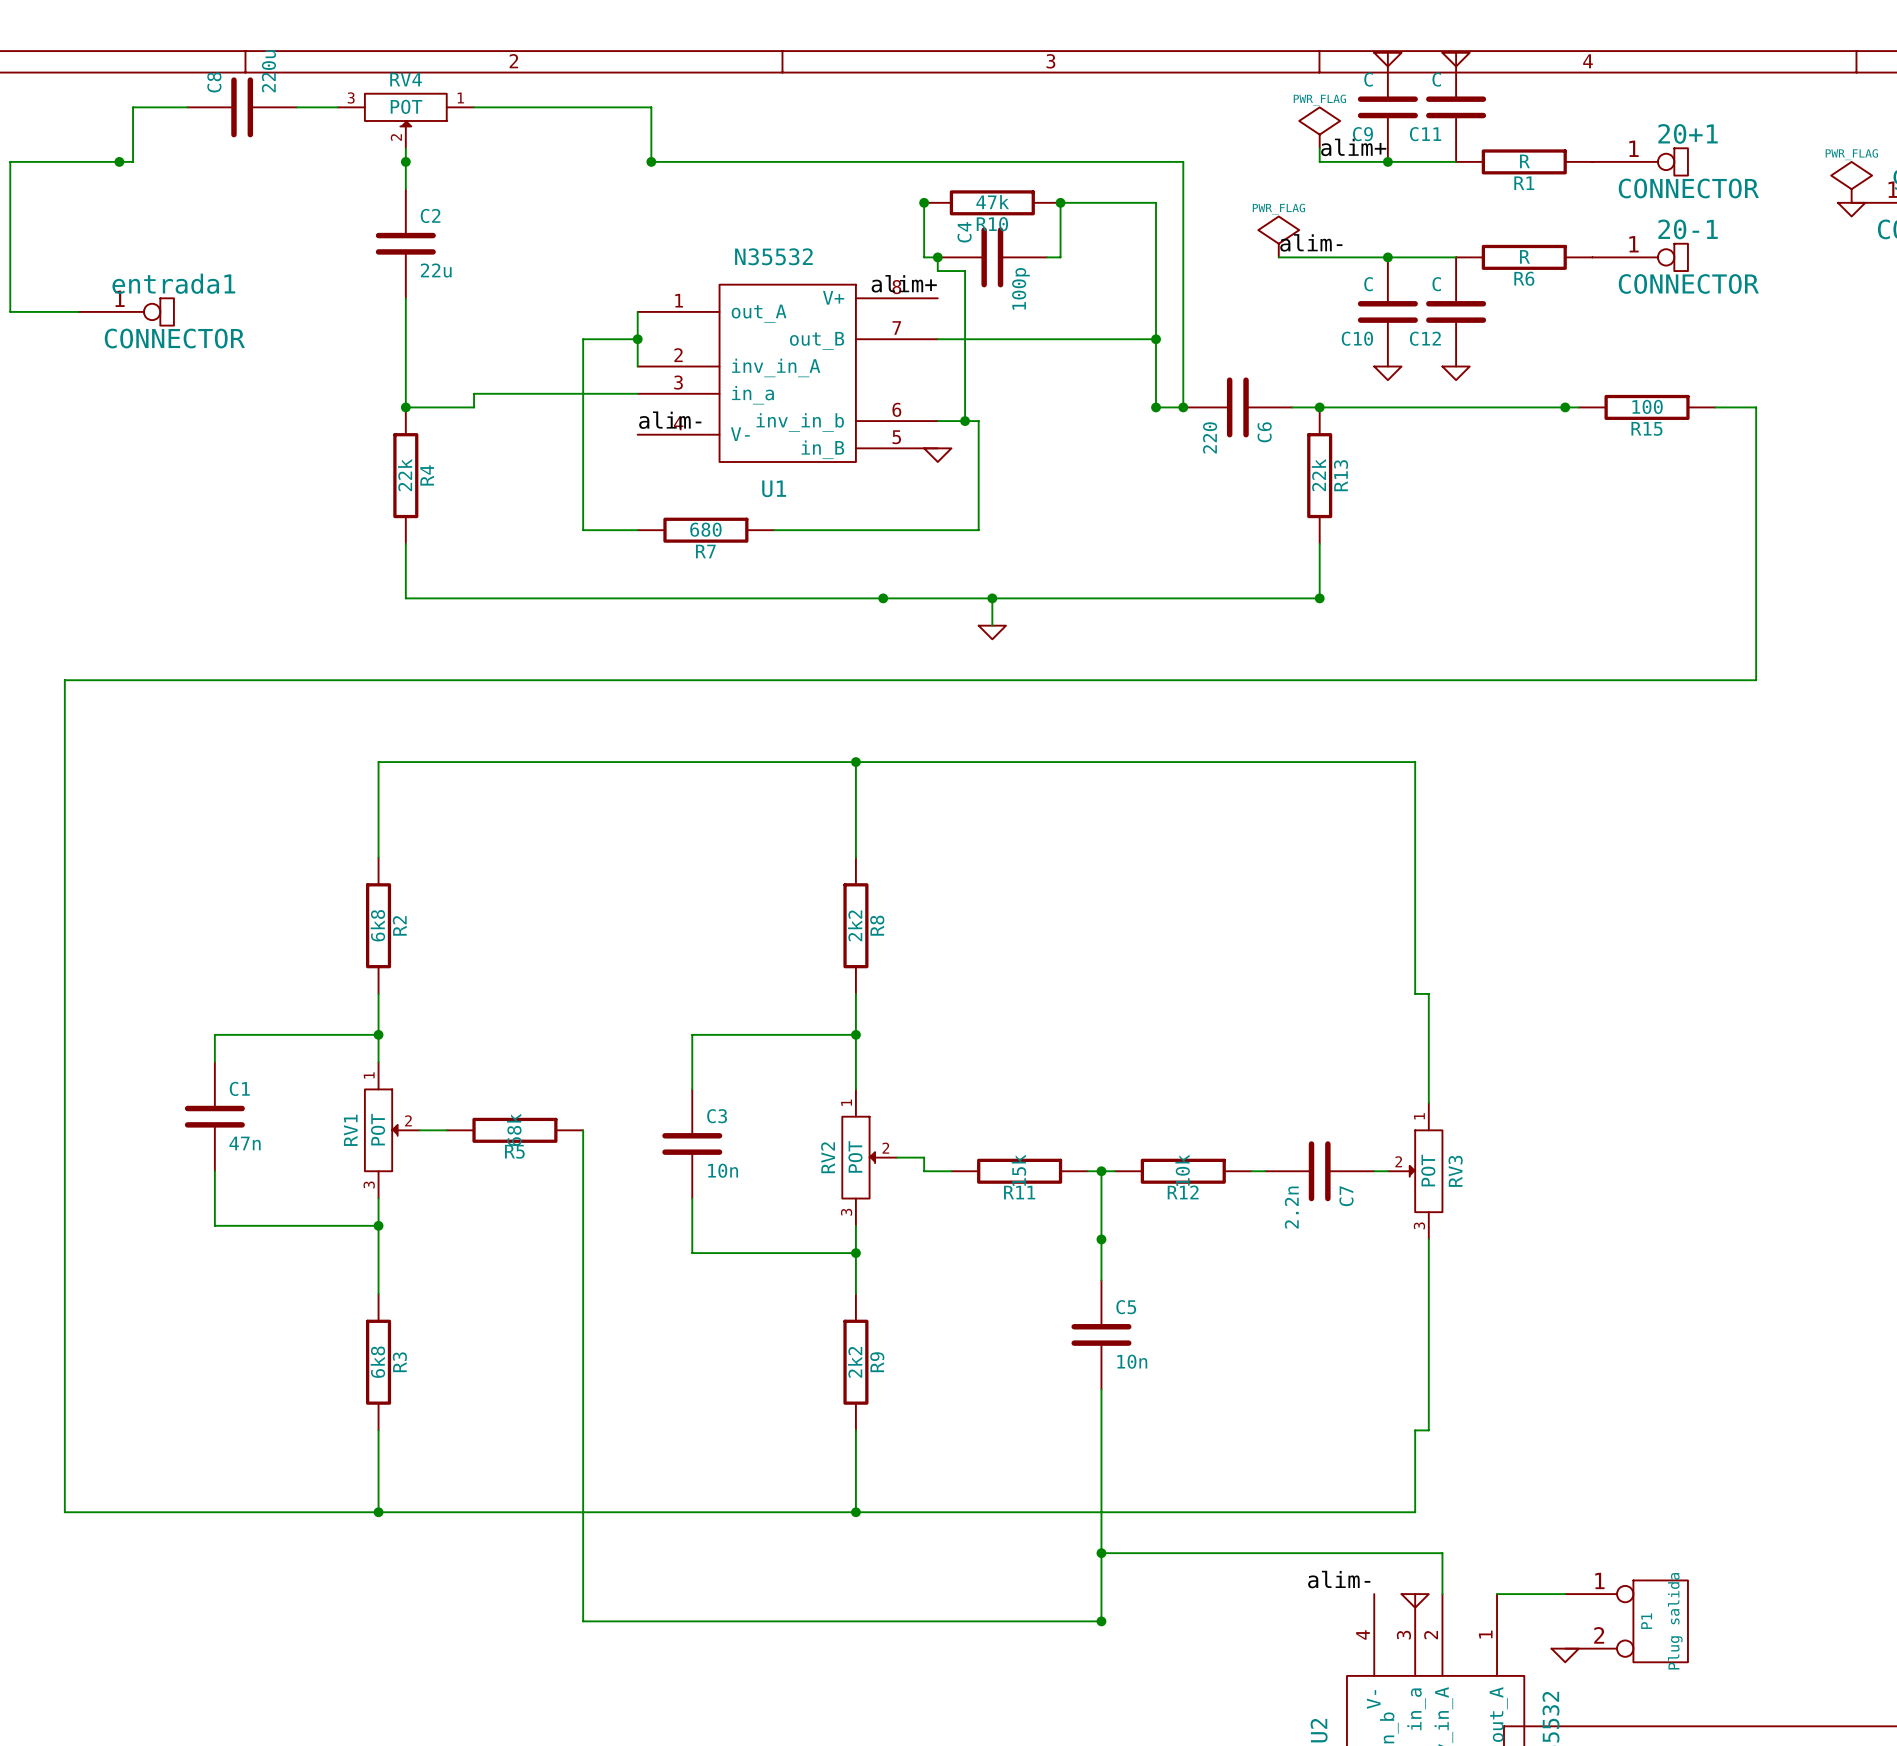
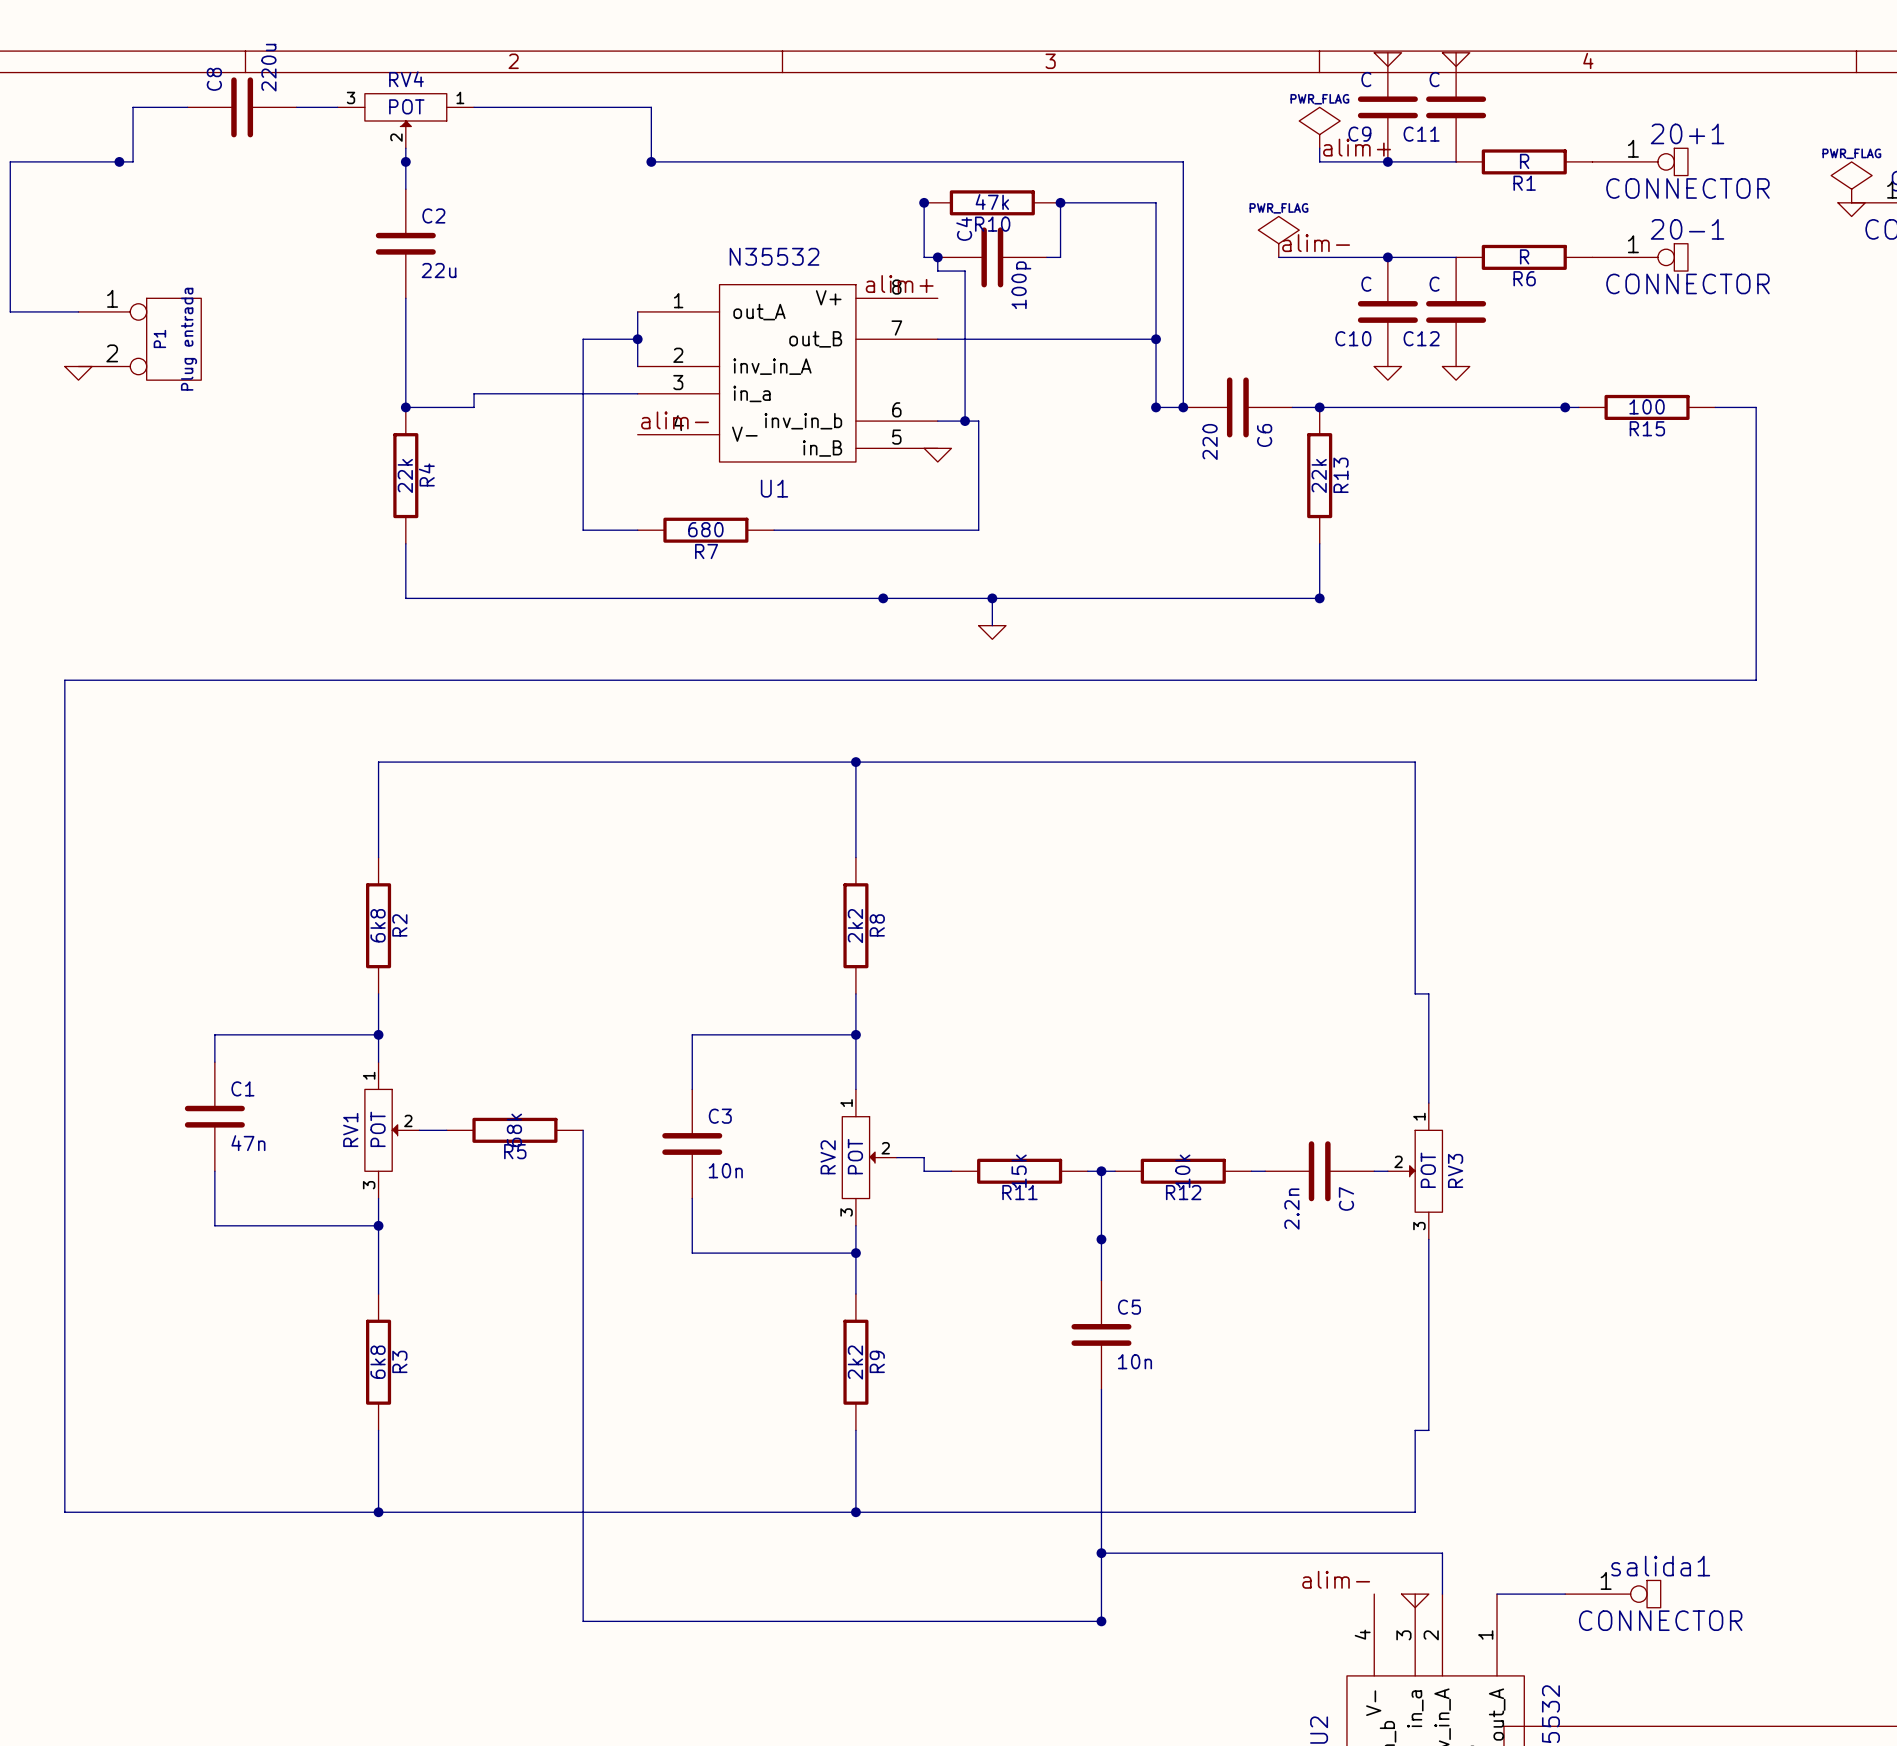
entrada1: CONNECTOR (126, 311) -> none
power symbol: none -> (78, 373)
salida1: none -> CONNECTOR (1612, 1594)
P1 position: (1626, 1621) -> (139, 339)
P1 value: Plug salida (1675, 1621) -> Plug entrada (189, 339)
power symbol: (1565, 1655) -> none

